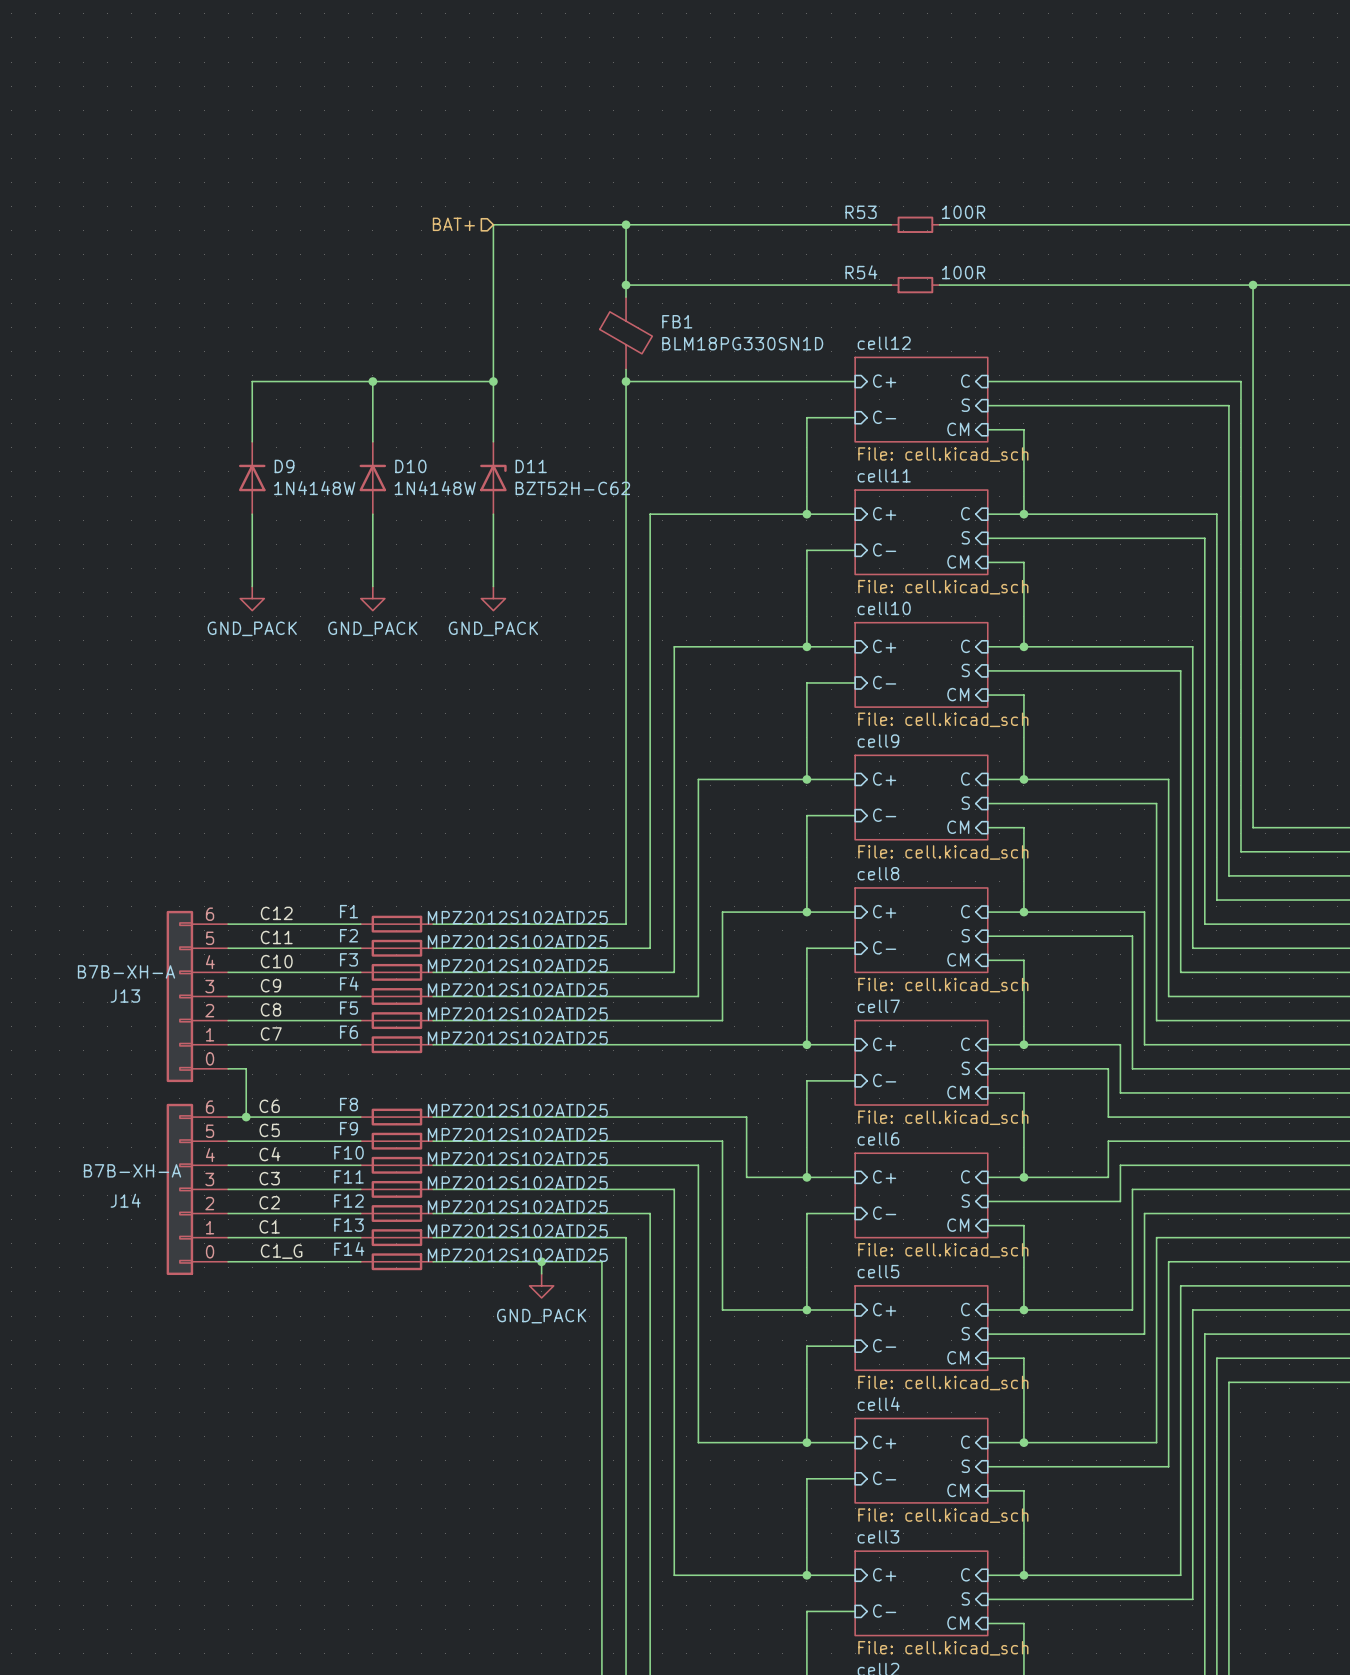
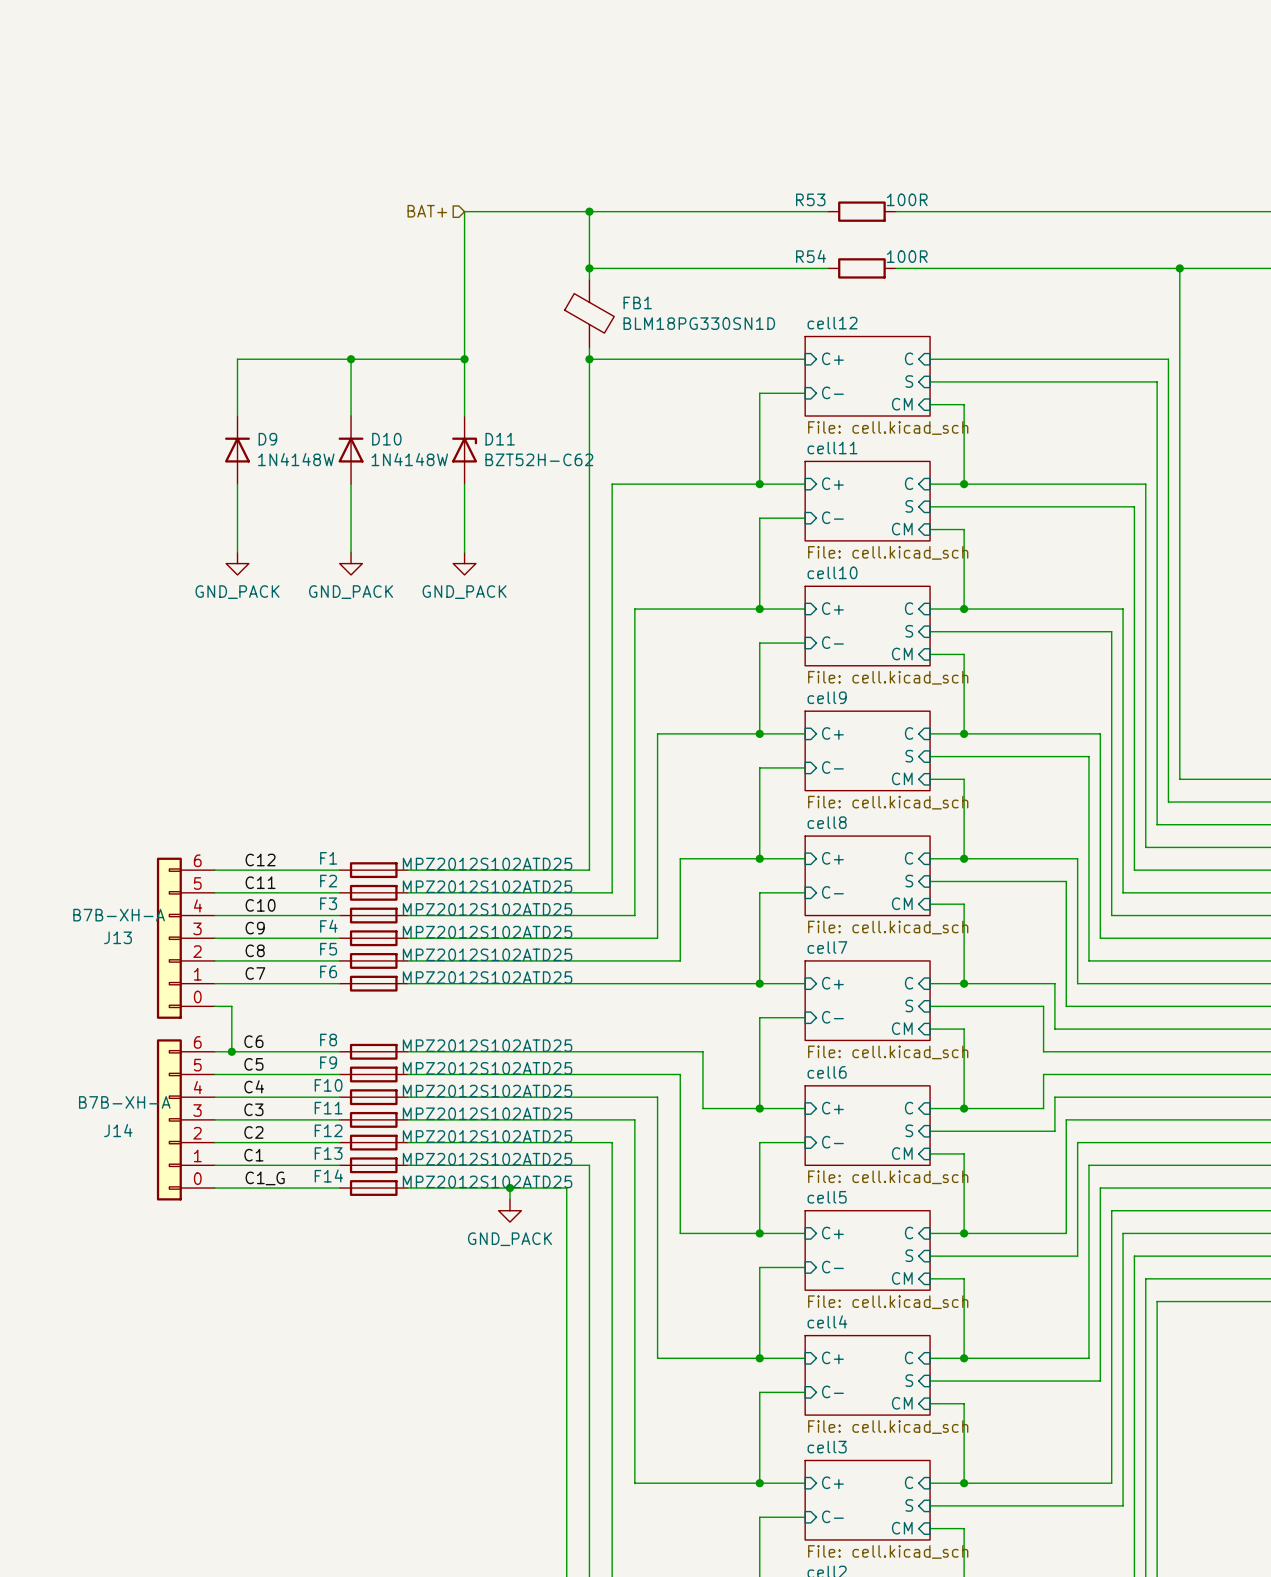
R53 symbol: [891, 216, 940, 233] -> [827, 201, 896, 222]
R54 symbol: [891, 276, 940, 294] -> [827, 258, 896, 279]

